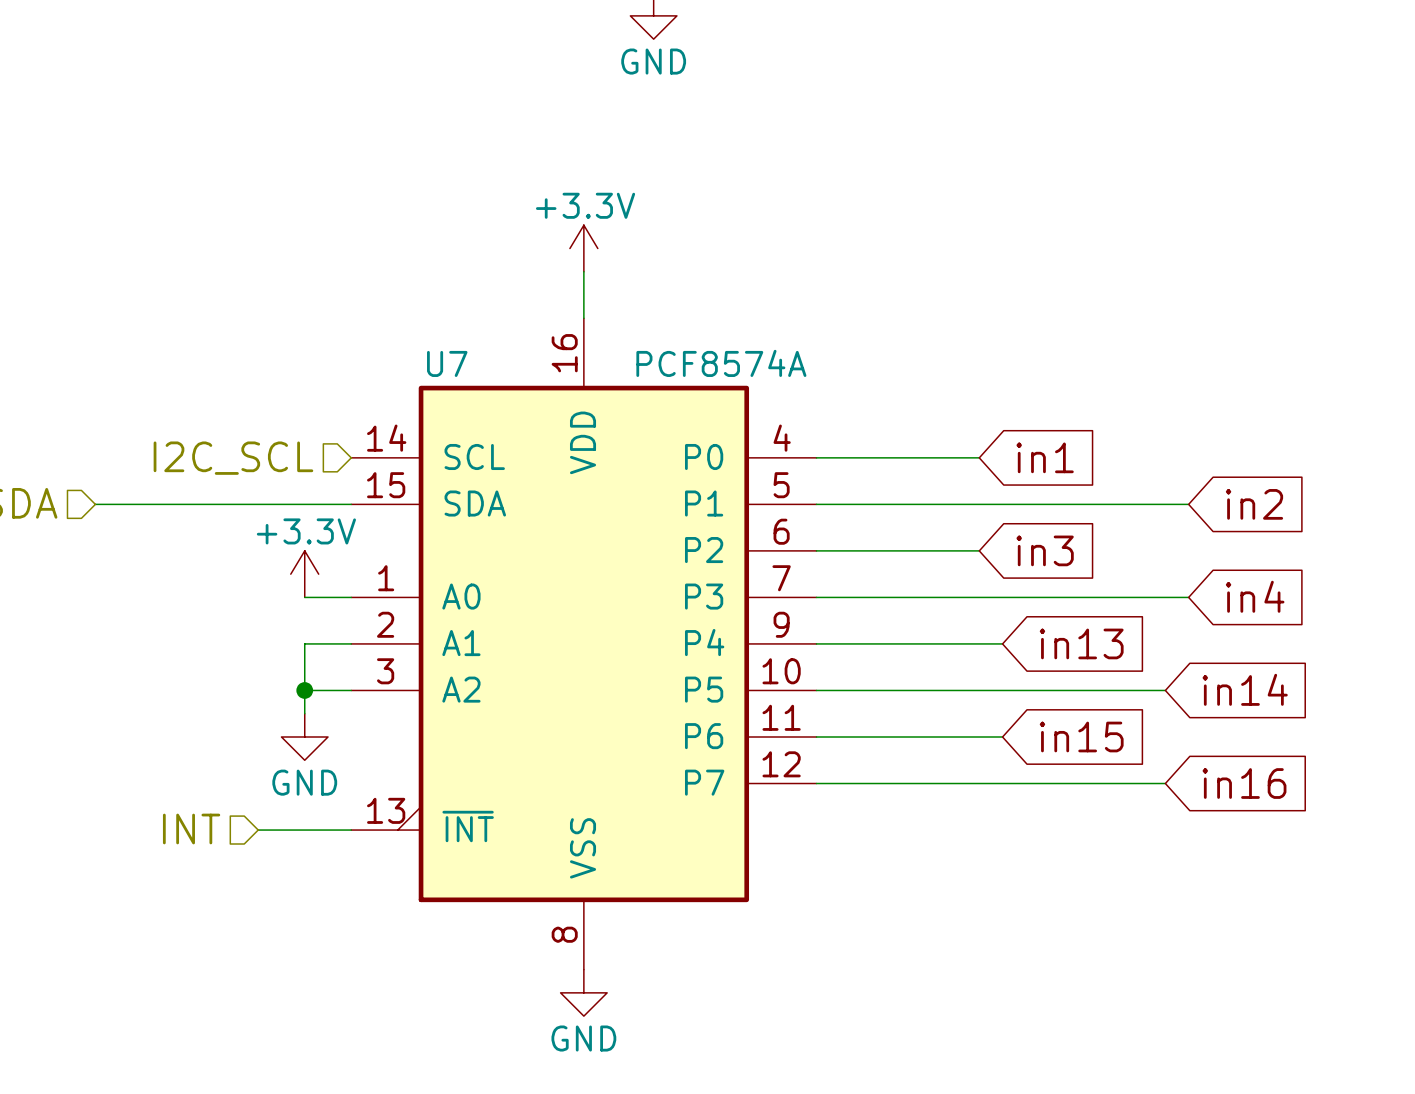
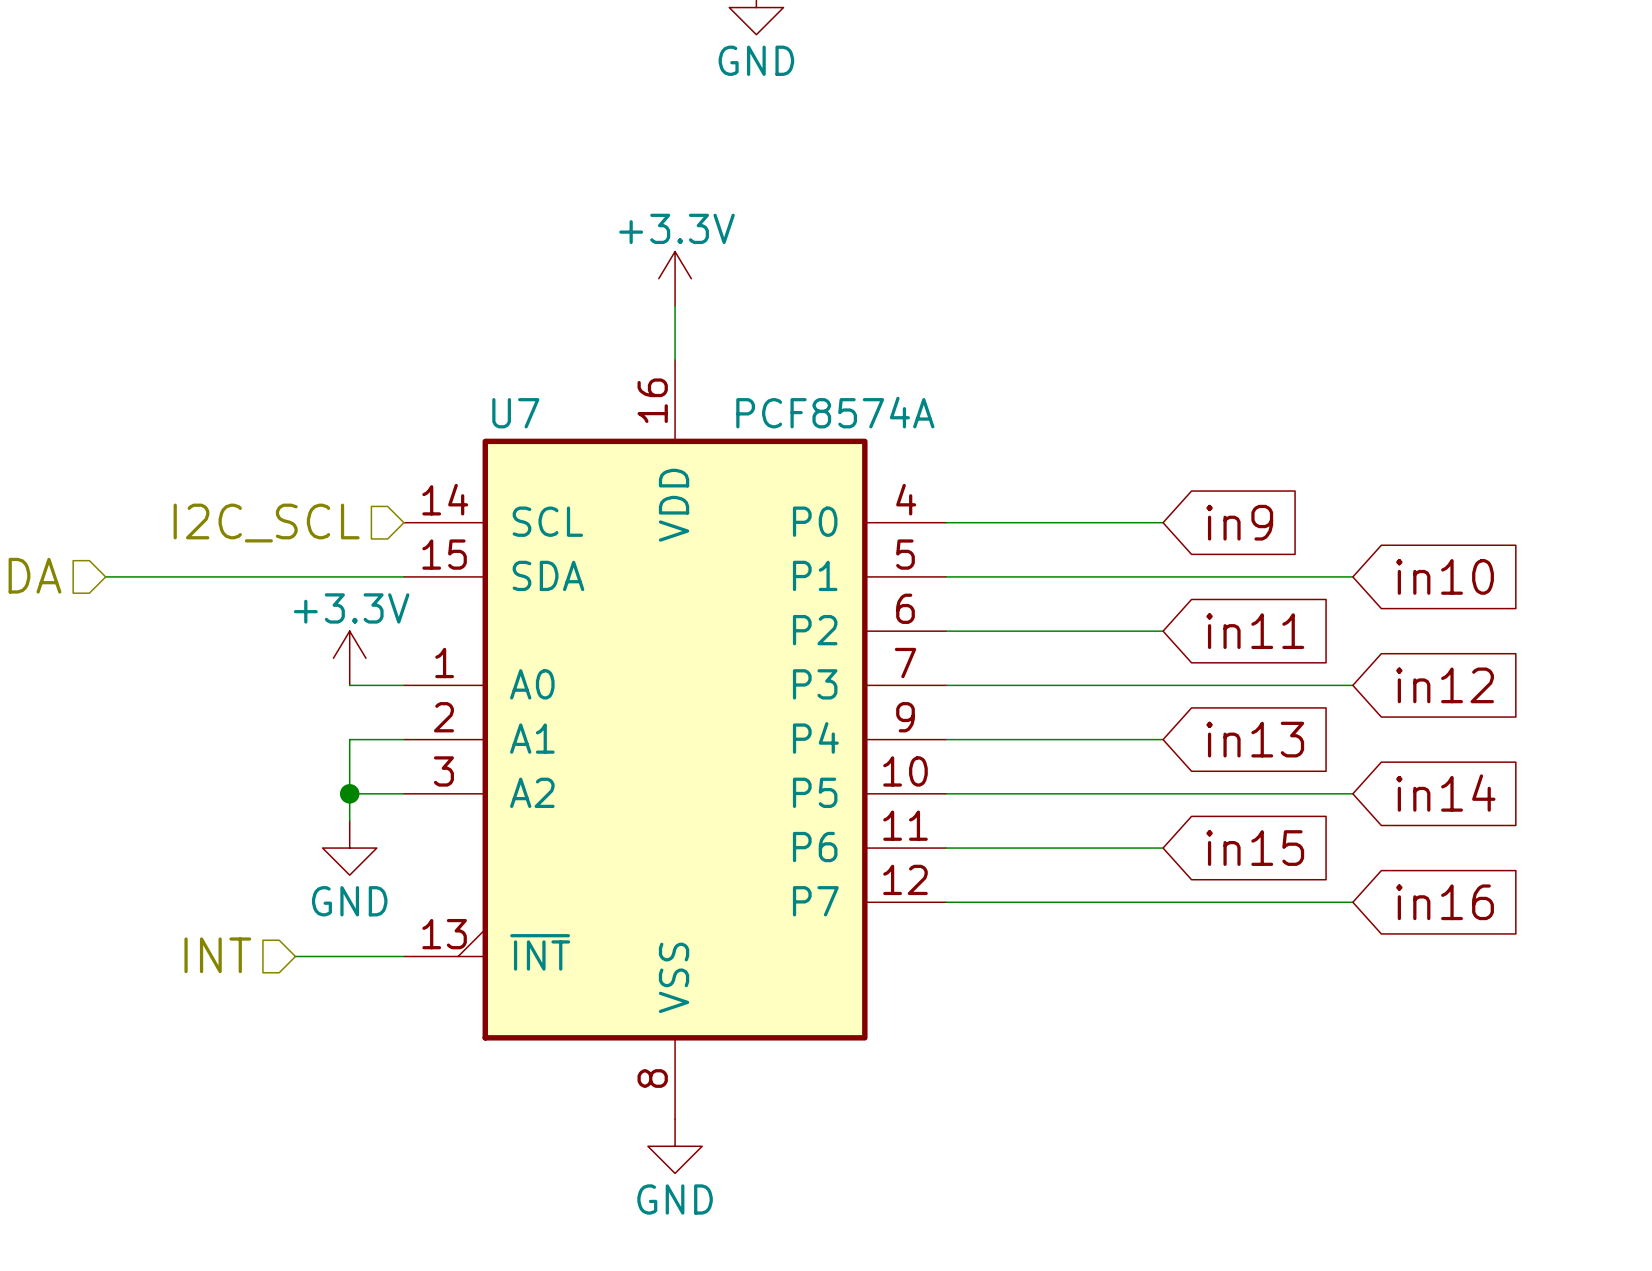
global label: in1 (1045, 457) -> in9 (1239, 522)
wire: (1165, 504) (1188, 504) -> (1135, 522) (1163, 522)
global label: none -> in10 (1445, 576)
global label: in2 (1254, 504) -> none
global label: in3 (1045, 550) -> none
global label: none -> in11 (1255, 631)
global label: in4 (1255, 596) -> none
wire: (1165, 597) (1188, 597) -> (1135, 631) (1163, 631)
global label: none -> in12 (1445, 685)

